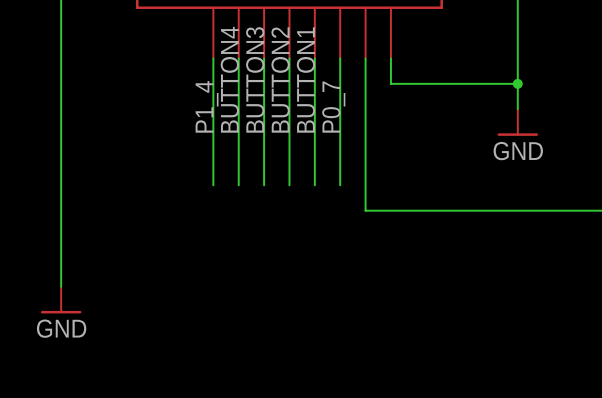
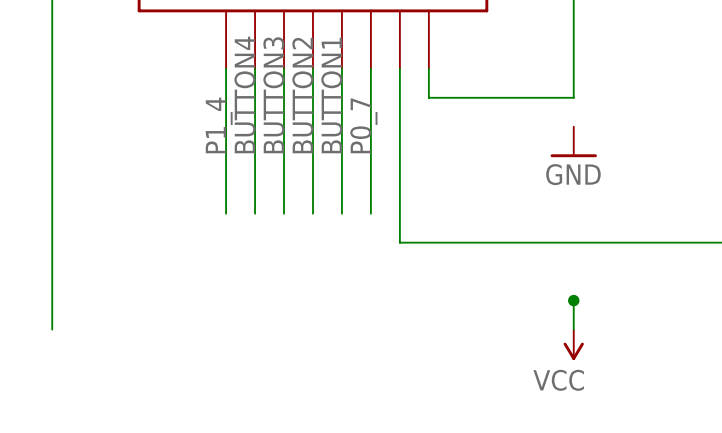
wire: (517, 83) (517, 109) -> (573, 300) (573, 329)
junction: (517, 83) -> none
junction: none -> (573, 300)
power symbol: GND (61, 300) -> none
power symbol: none -> VCC (573, 344)

